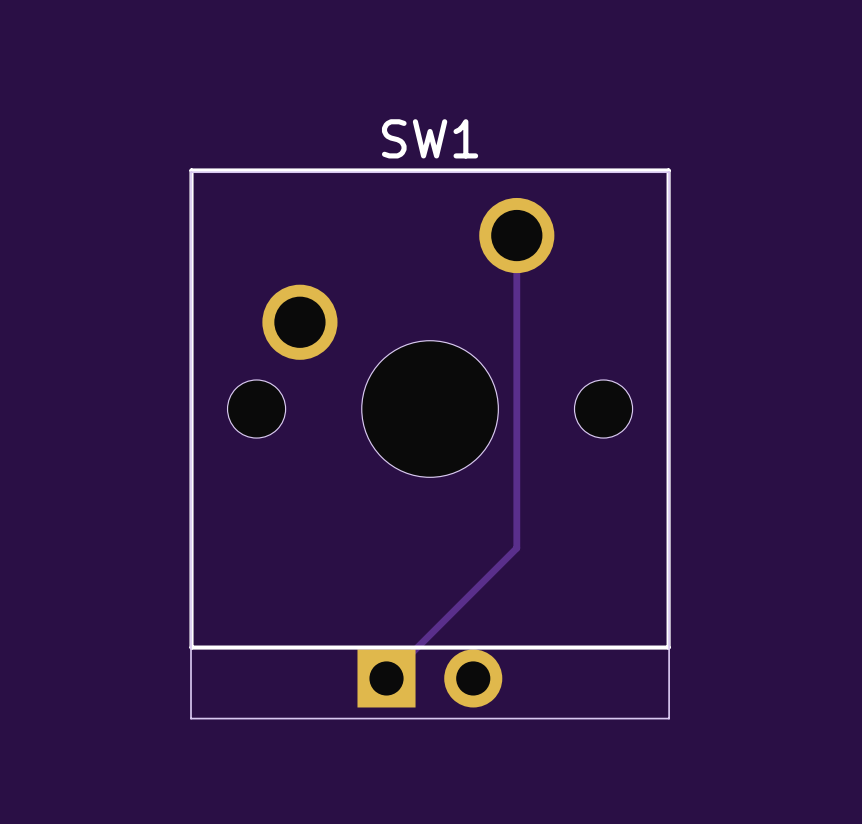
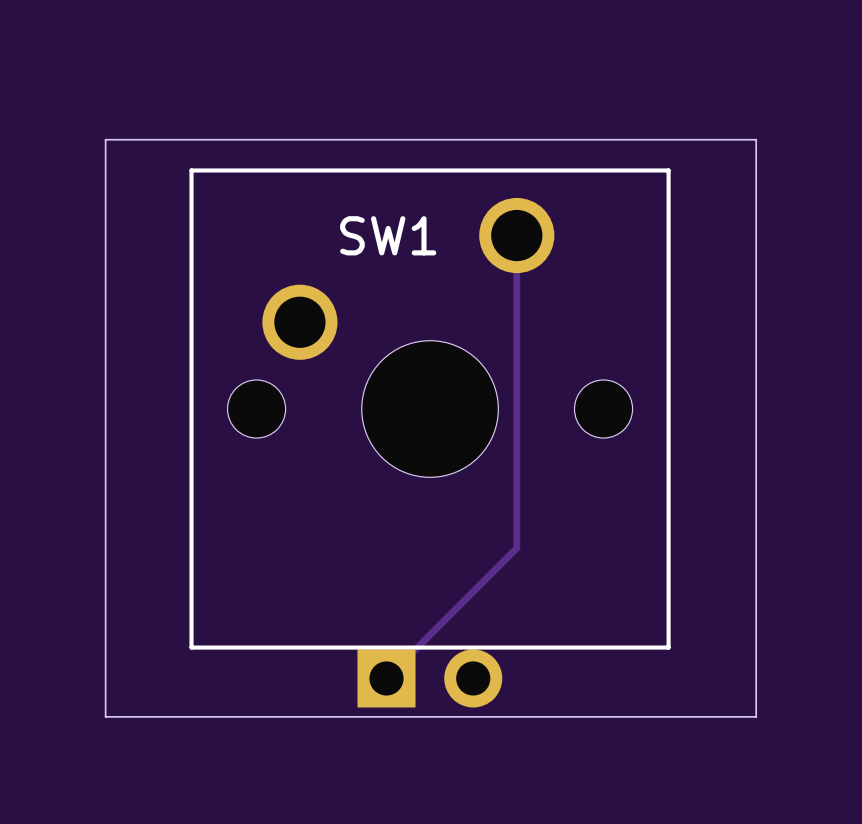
SW1 name position: SW1 (430, 138) -> SW1 (388, 235)
board edge: (191, 172) (669, 172) (669, 718) (191, 718) (191, 172) -> (105, 139) (105, 716) (756, 716) (756, 139) (105, 139)

